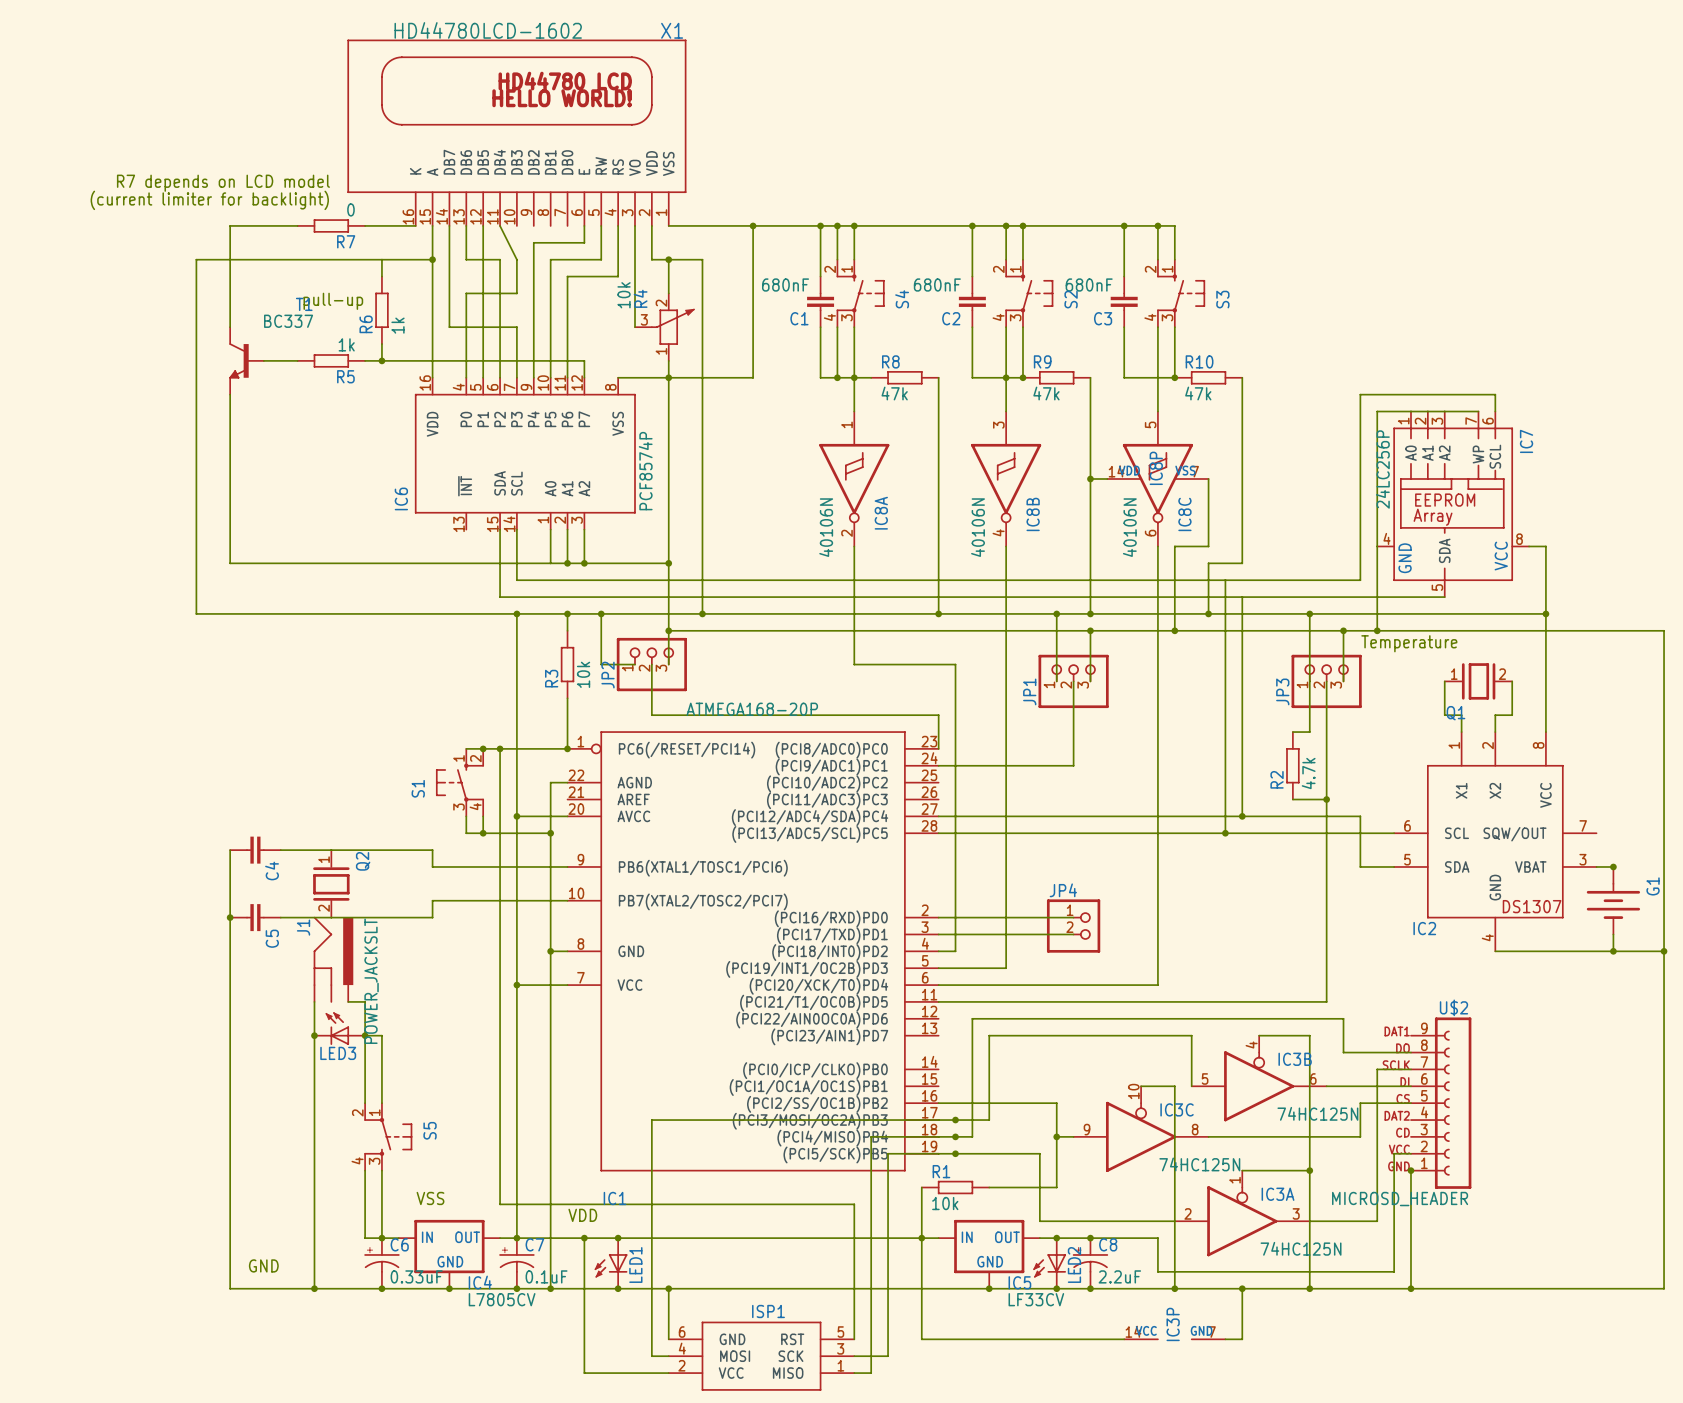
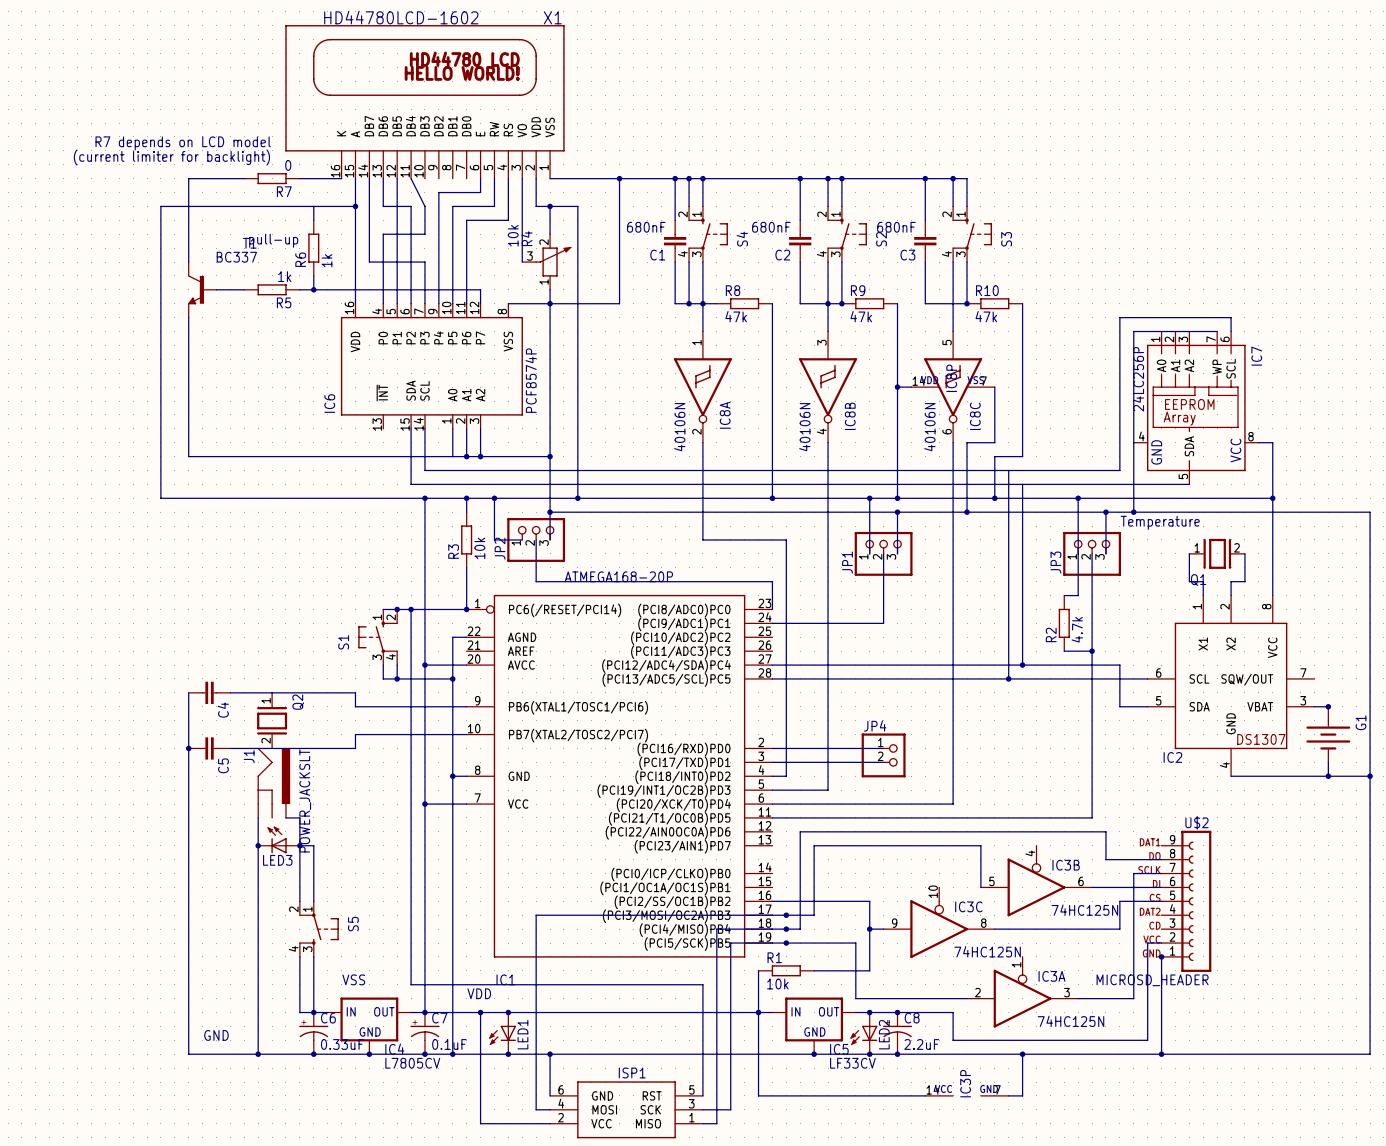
wire: (1259, 1035) (1309, 1035) (1309, 1288) -> none
wire: (1141, 1086) (1174, 1086) (1174, 1288) -> none
wire: (1242, 1170) (1309, 1170) -> none
junction: (1309, 1170) -> none
junction: (1174, 1288) -> none
junction: (1309, 1288) -> none

